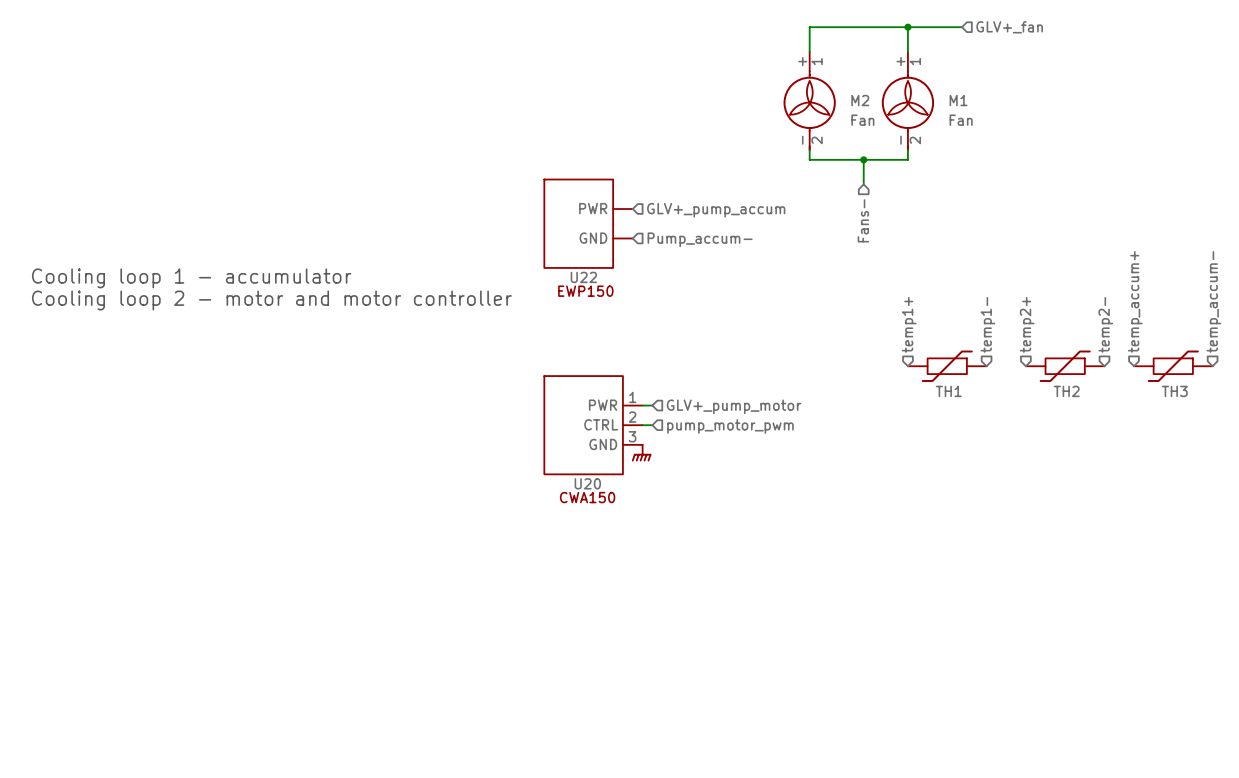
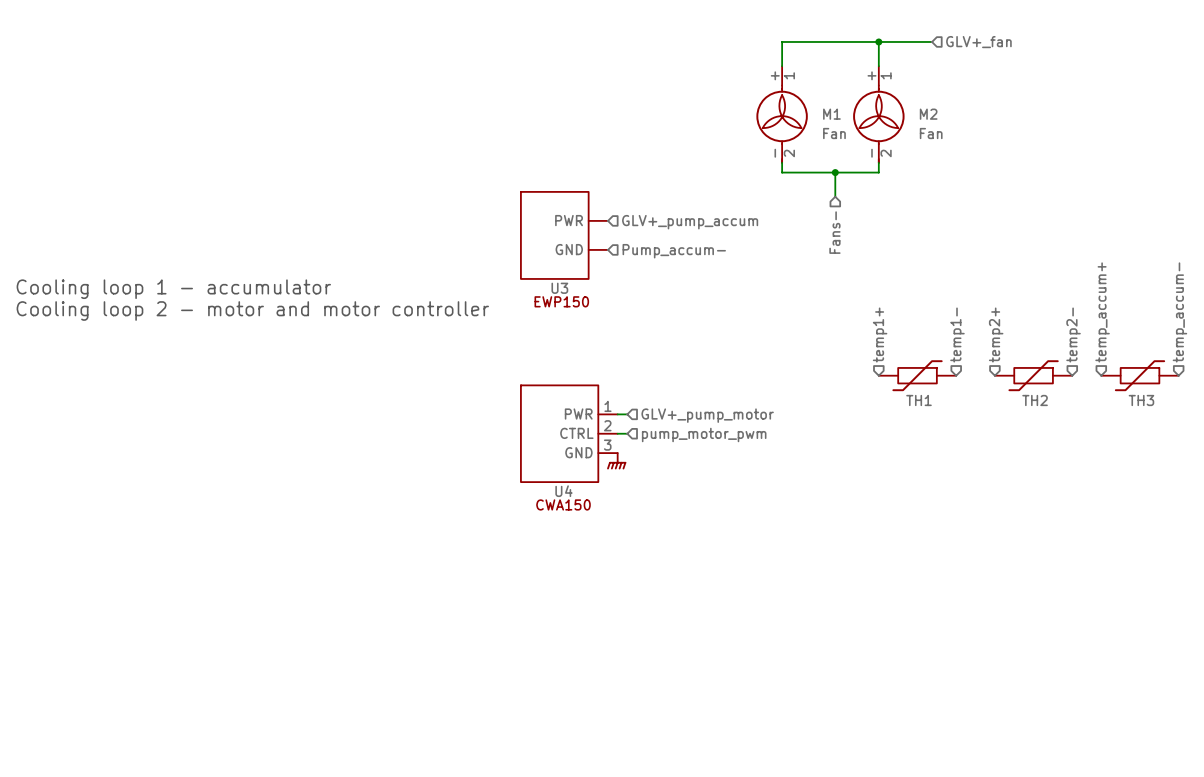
M2 name: M2 (860, 100) -> M1 (831, 114)
M1 name: M1 (958, 100) -> M2 (928, 114)
U22 name: U22 (583, 277) -> U3 (559, 288)
U20 name: U20 (587, 483) -> U4 (563, 491)

